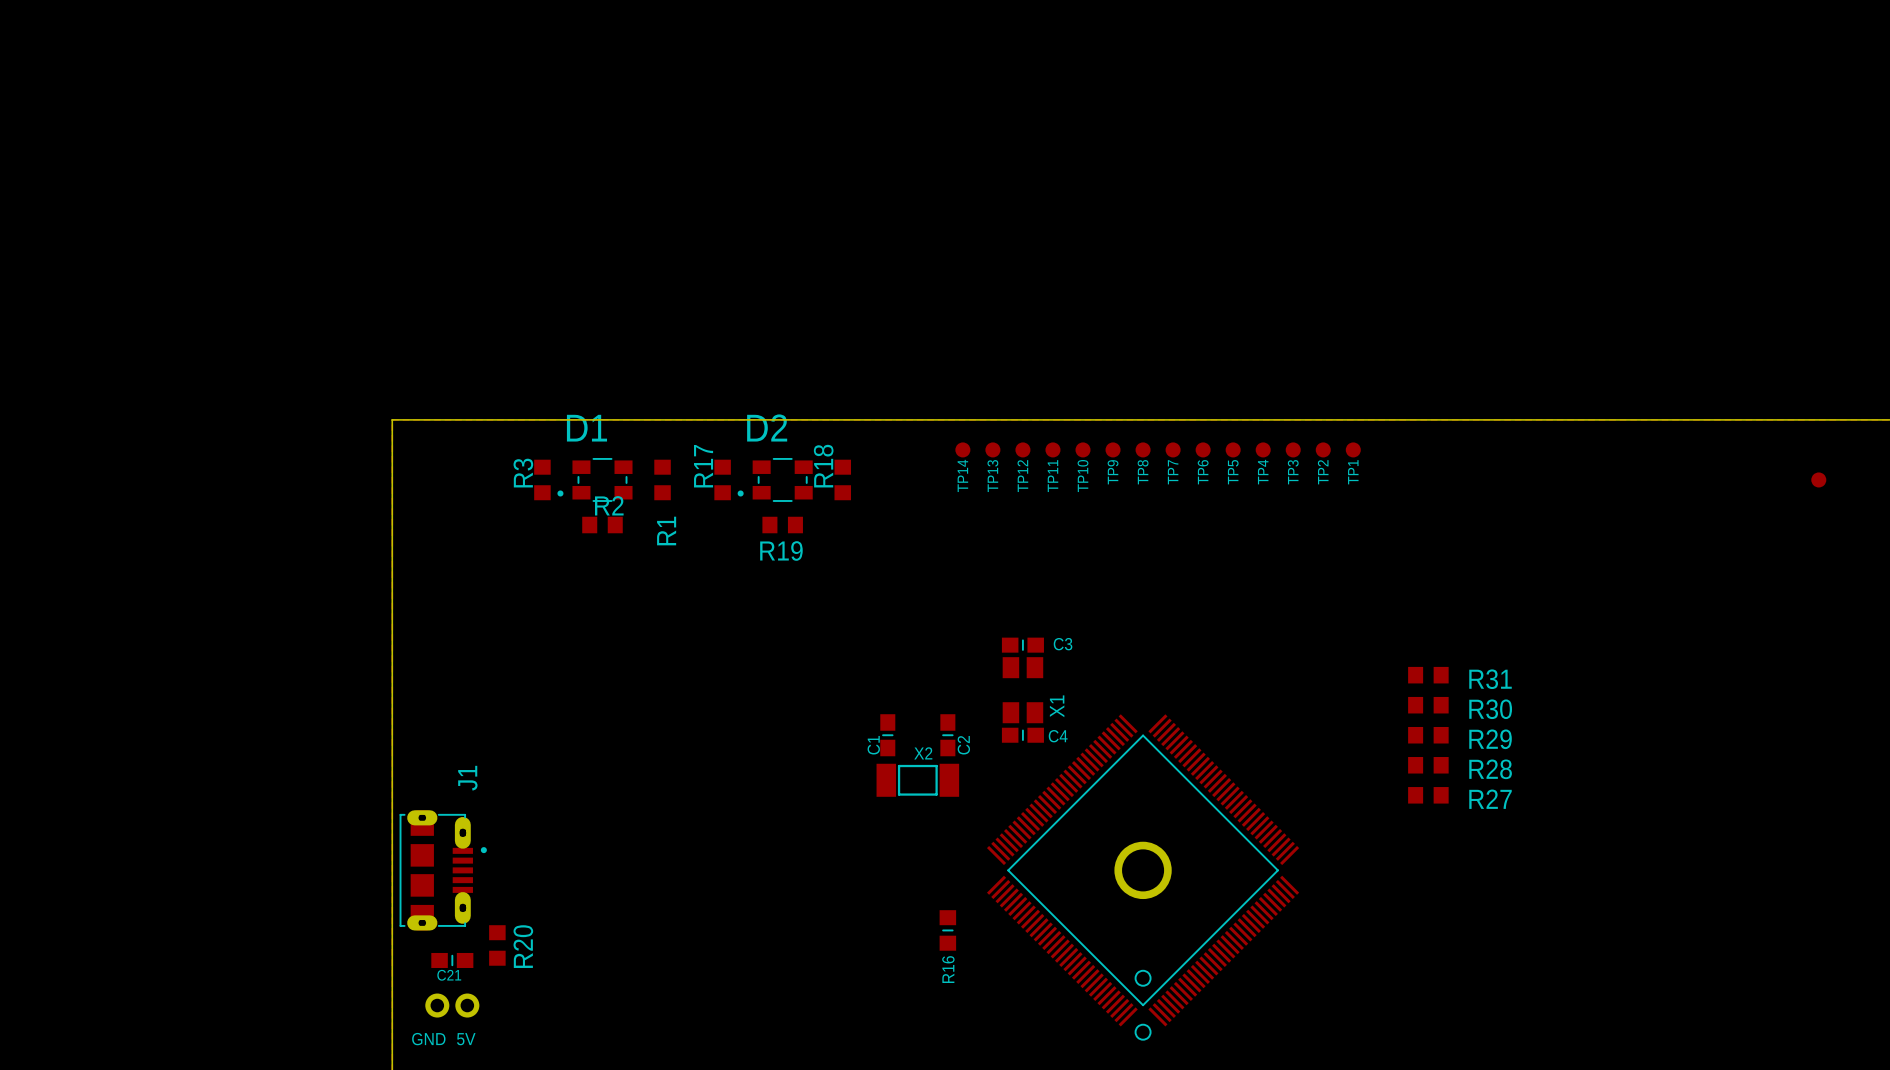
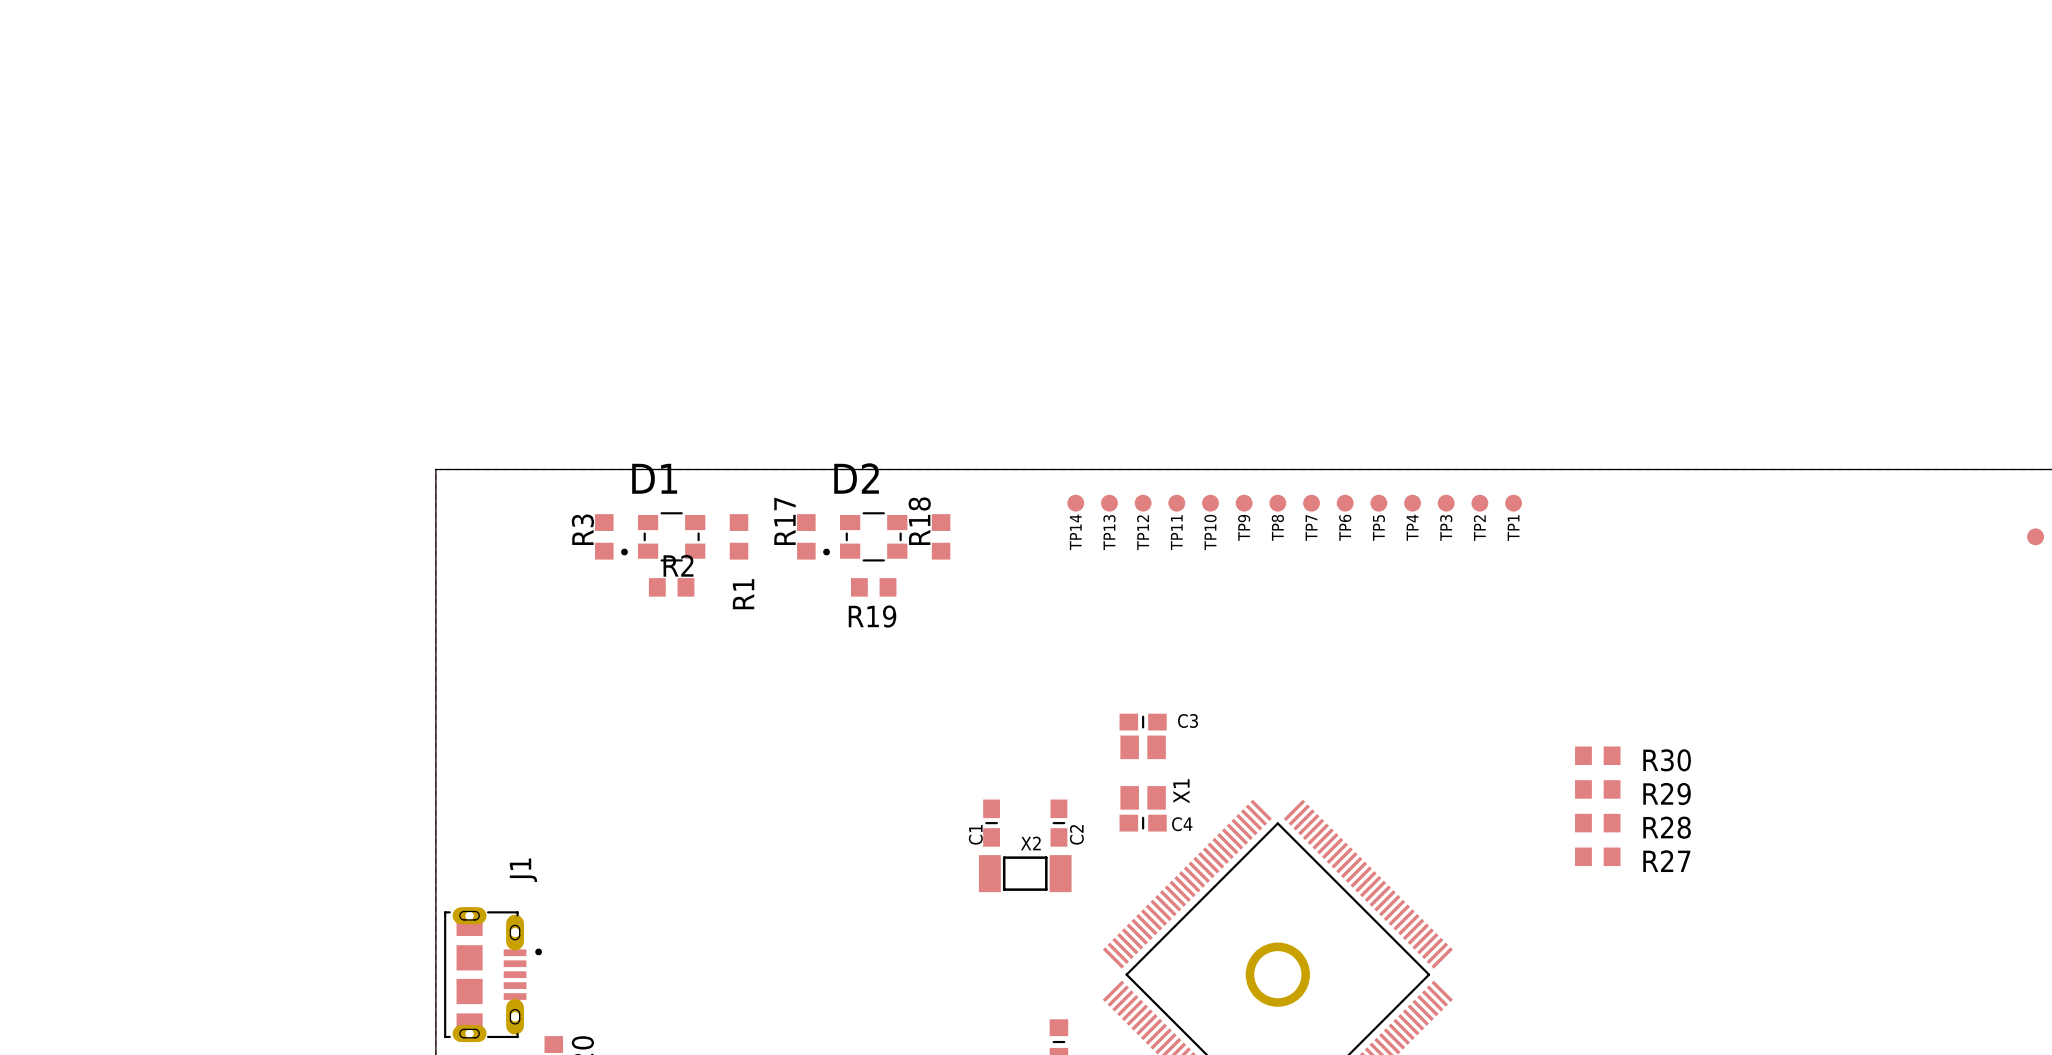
R31 name: R31 (1490, 679) -> R30 (1667, 760)
R30 name: R30 (1490, 709) -> R29 (1667, 794)
R29 name: R29 (1490, 739) -> R28 (1667, 827)
R28 name: R28 (1490, 769) -> R27 (1666, 861)
R27: (1428, 795) -> none

